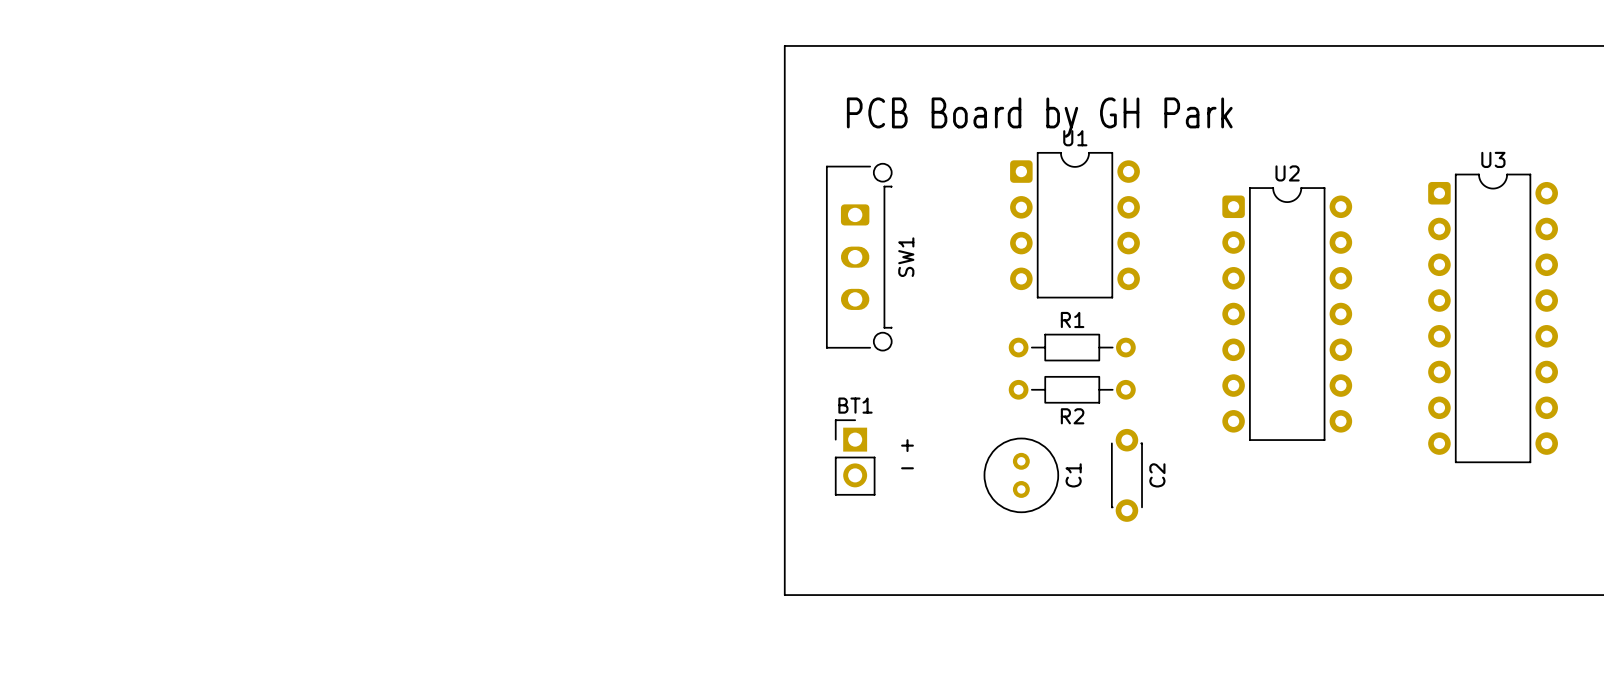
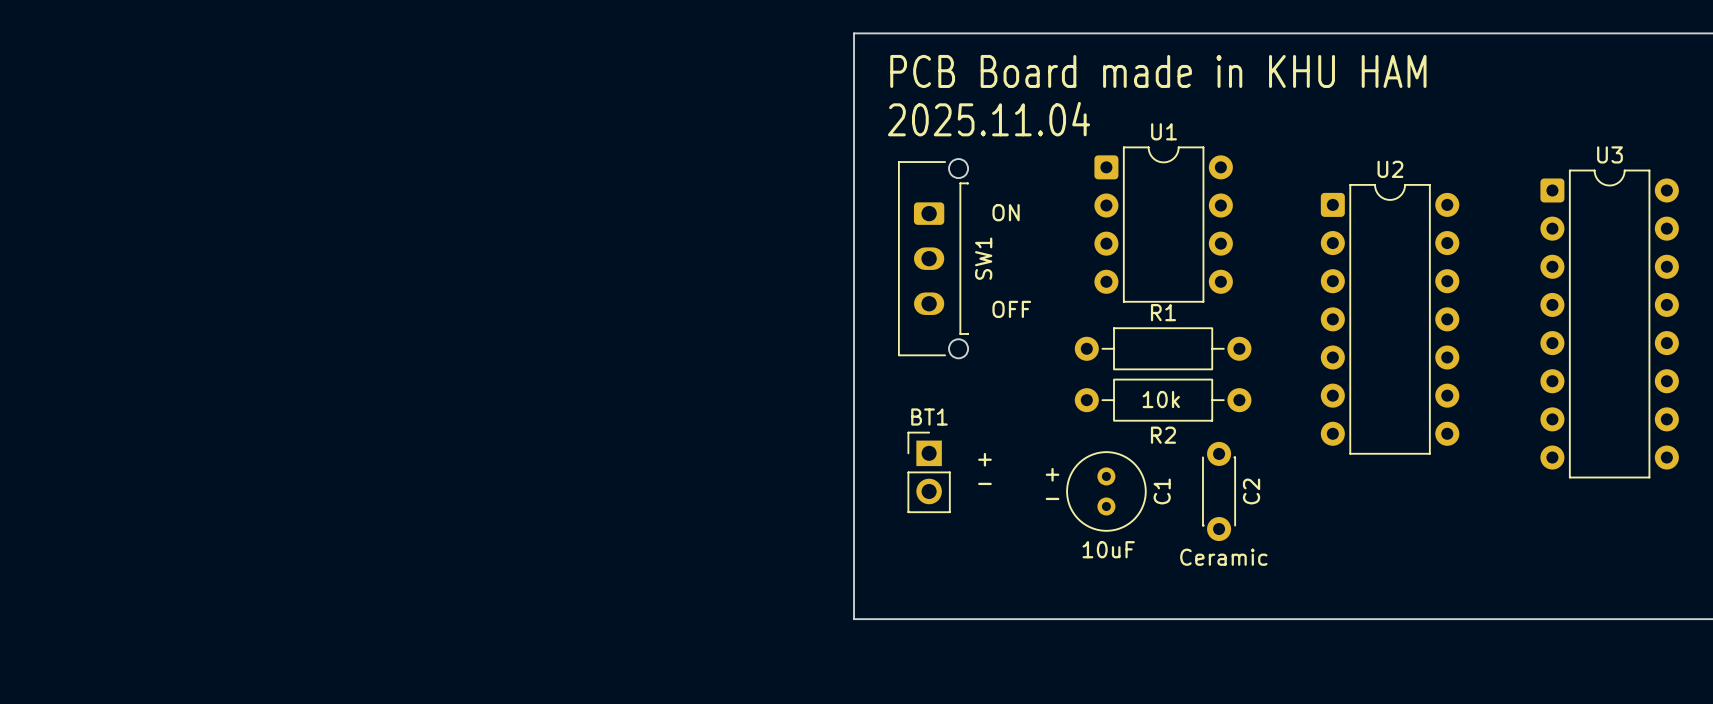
text: none -> PCB Board made in KHU HAM (1158, 71)
text: PCB Board by GH Park (1039, 117) -> none
text: none -> 2025.11.04 (989, 119)
text: none -> ON (1006, 212)
text: none -> OFF (1011, 309)
R1 footprint: [1008, 333, 1136, 362] -> [1074, 327, 1252, 371]
R2 footprint: [1008, 375, 1136, 404] -> [1074, 378, 1252, 422]
text: none -> 10k (1161, 399)
text: none -> + (1052, 474)
text: none -> - (1052, 498)
text: none -> 10uF (1108, 549)
text: none -> Ceramic (1223, 557)

